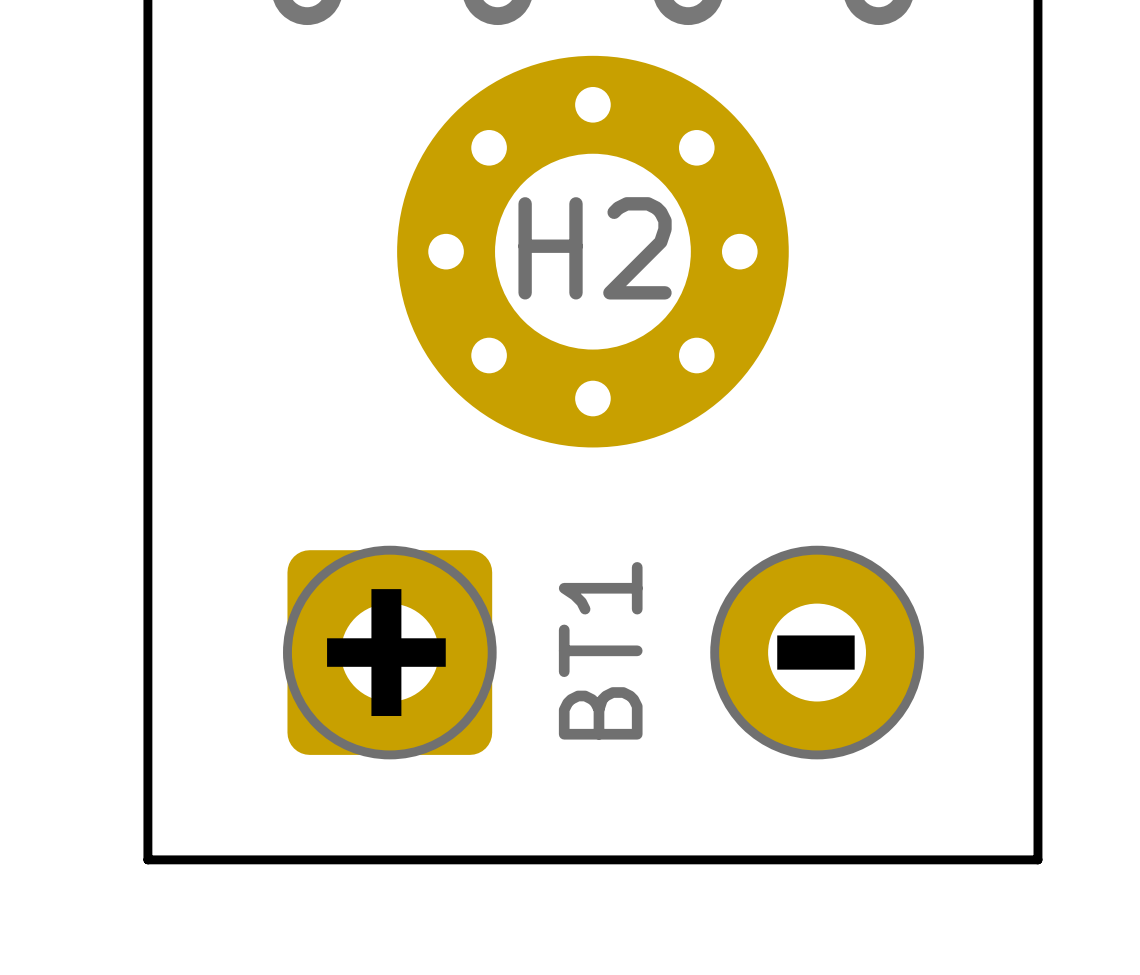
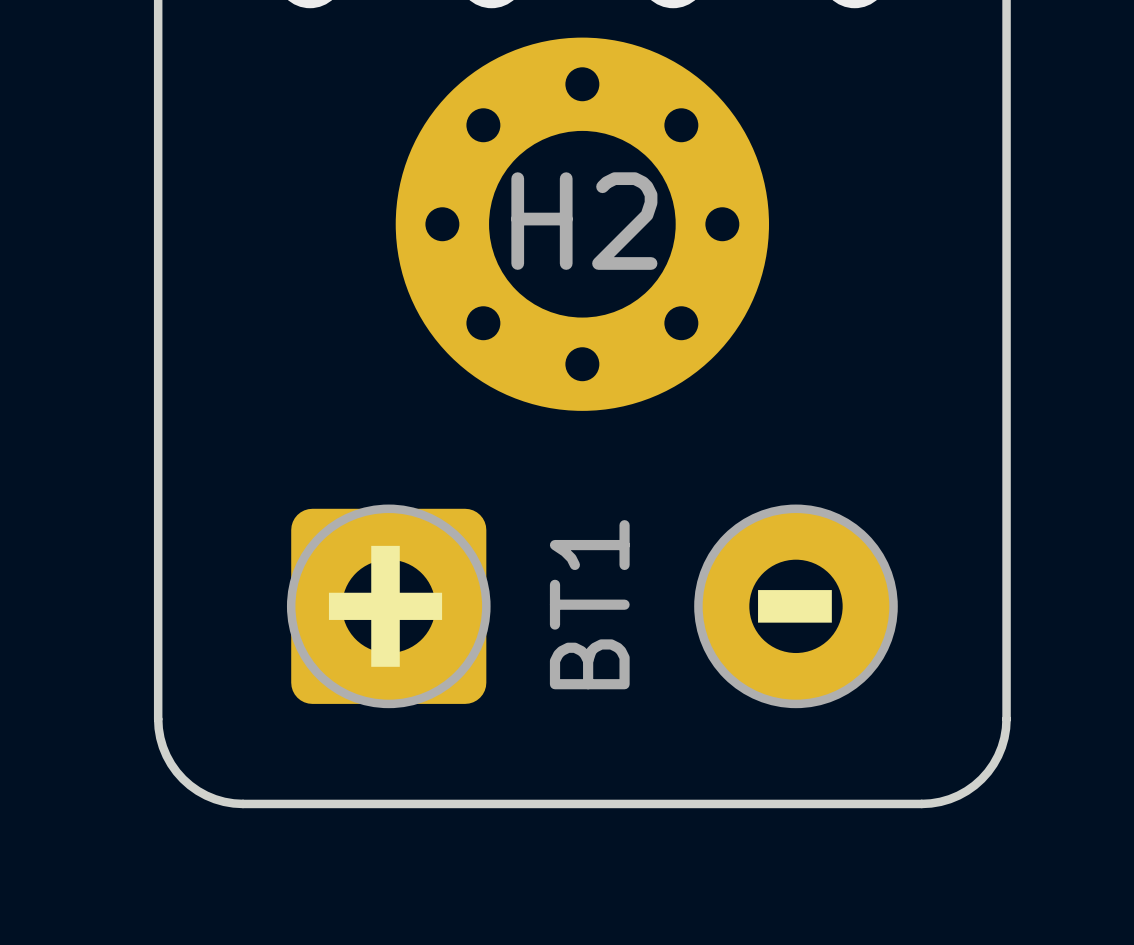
board edge: (147, 770) (147, 859) (236, 859) -> (158, 719) (160, 737) (166, 755) (183, 779) (197, 790) (215, 799) (243, 803)
board edge: (1037, 770) (1037, 859) (948, 859) -> (1006, 719) (1001, 747) (993, 764) (981, 779) (966, 790) (949, 799) (921, 803)

